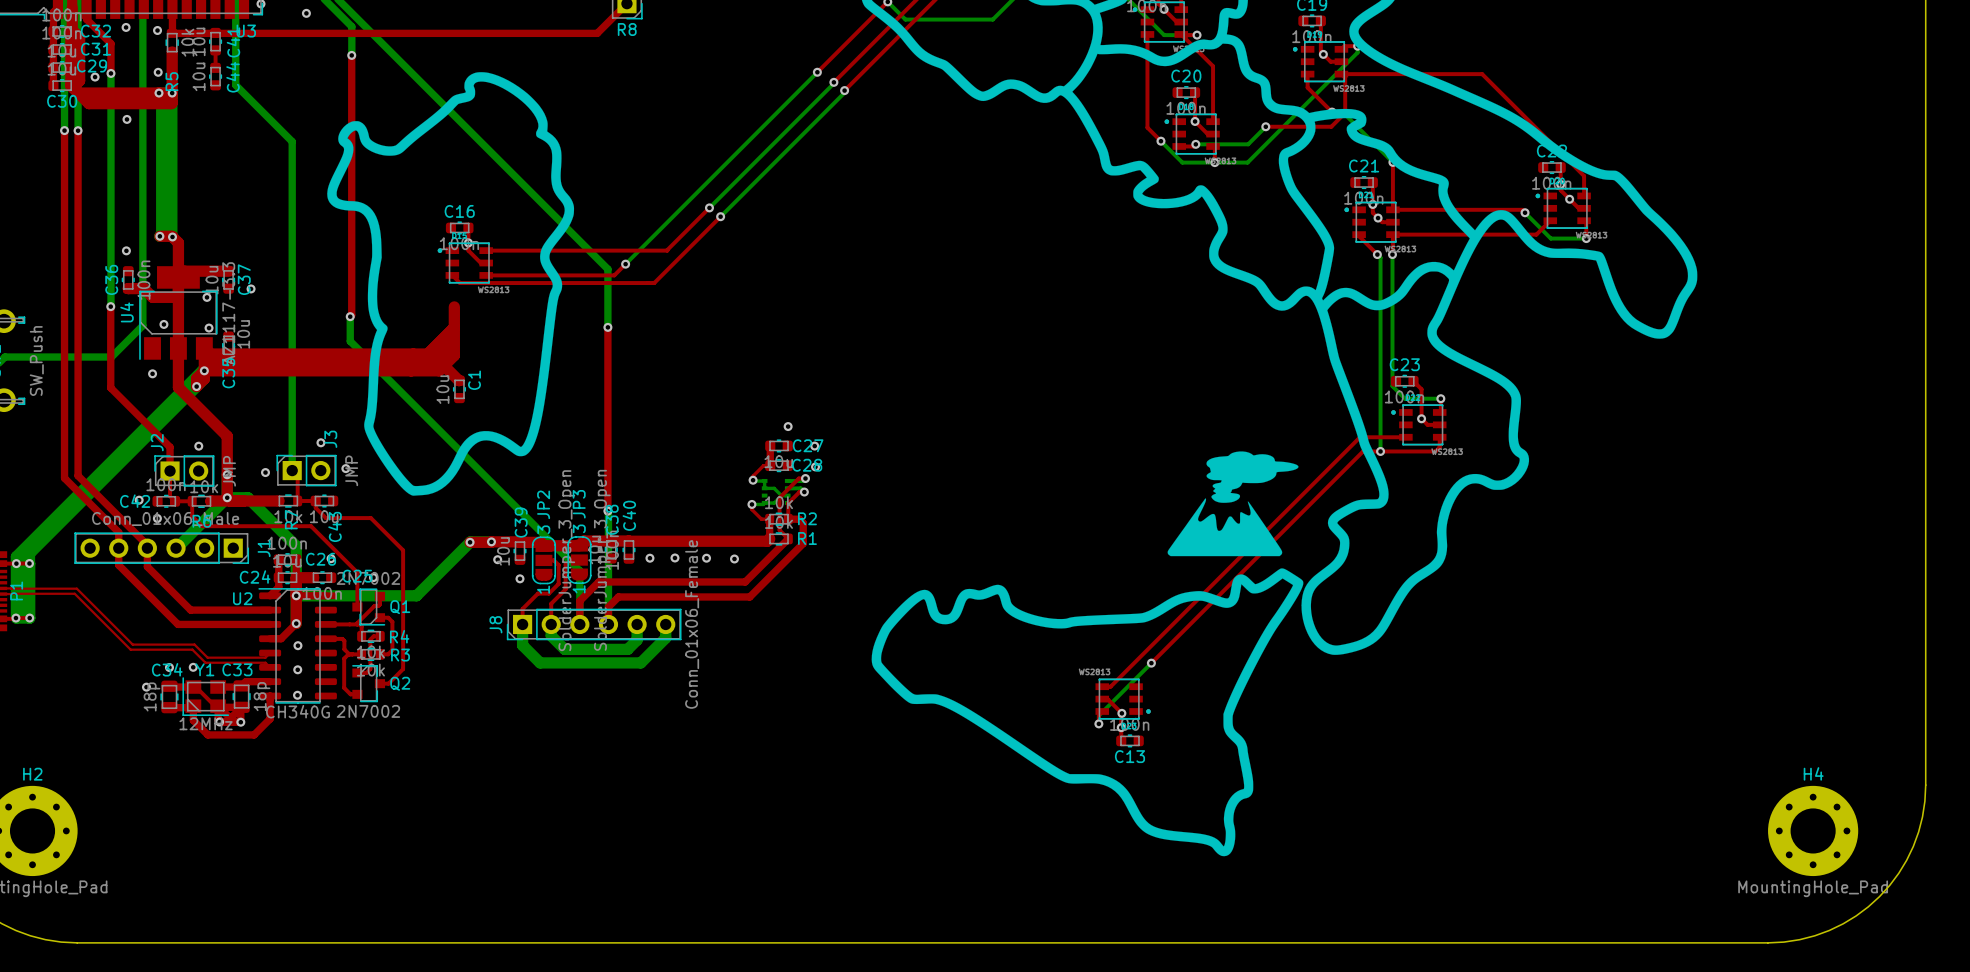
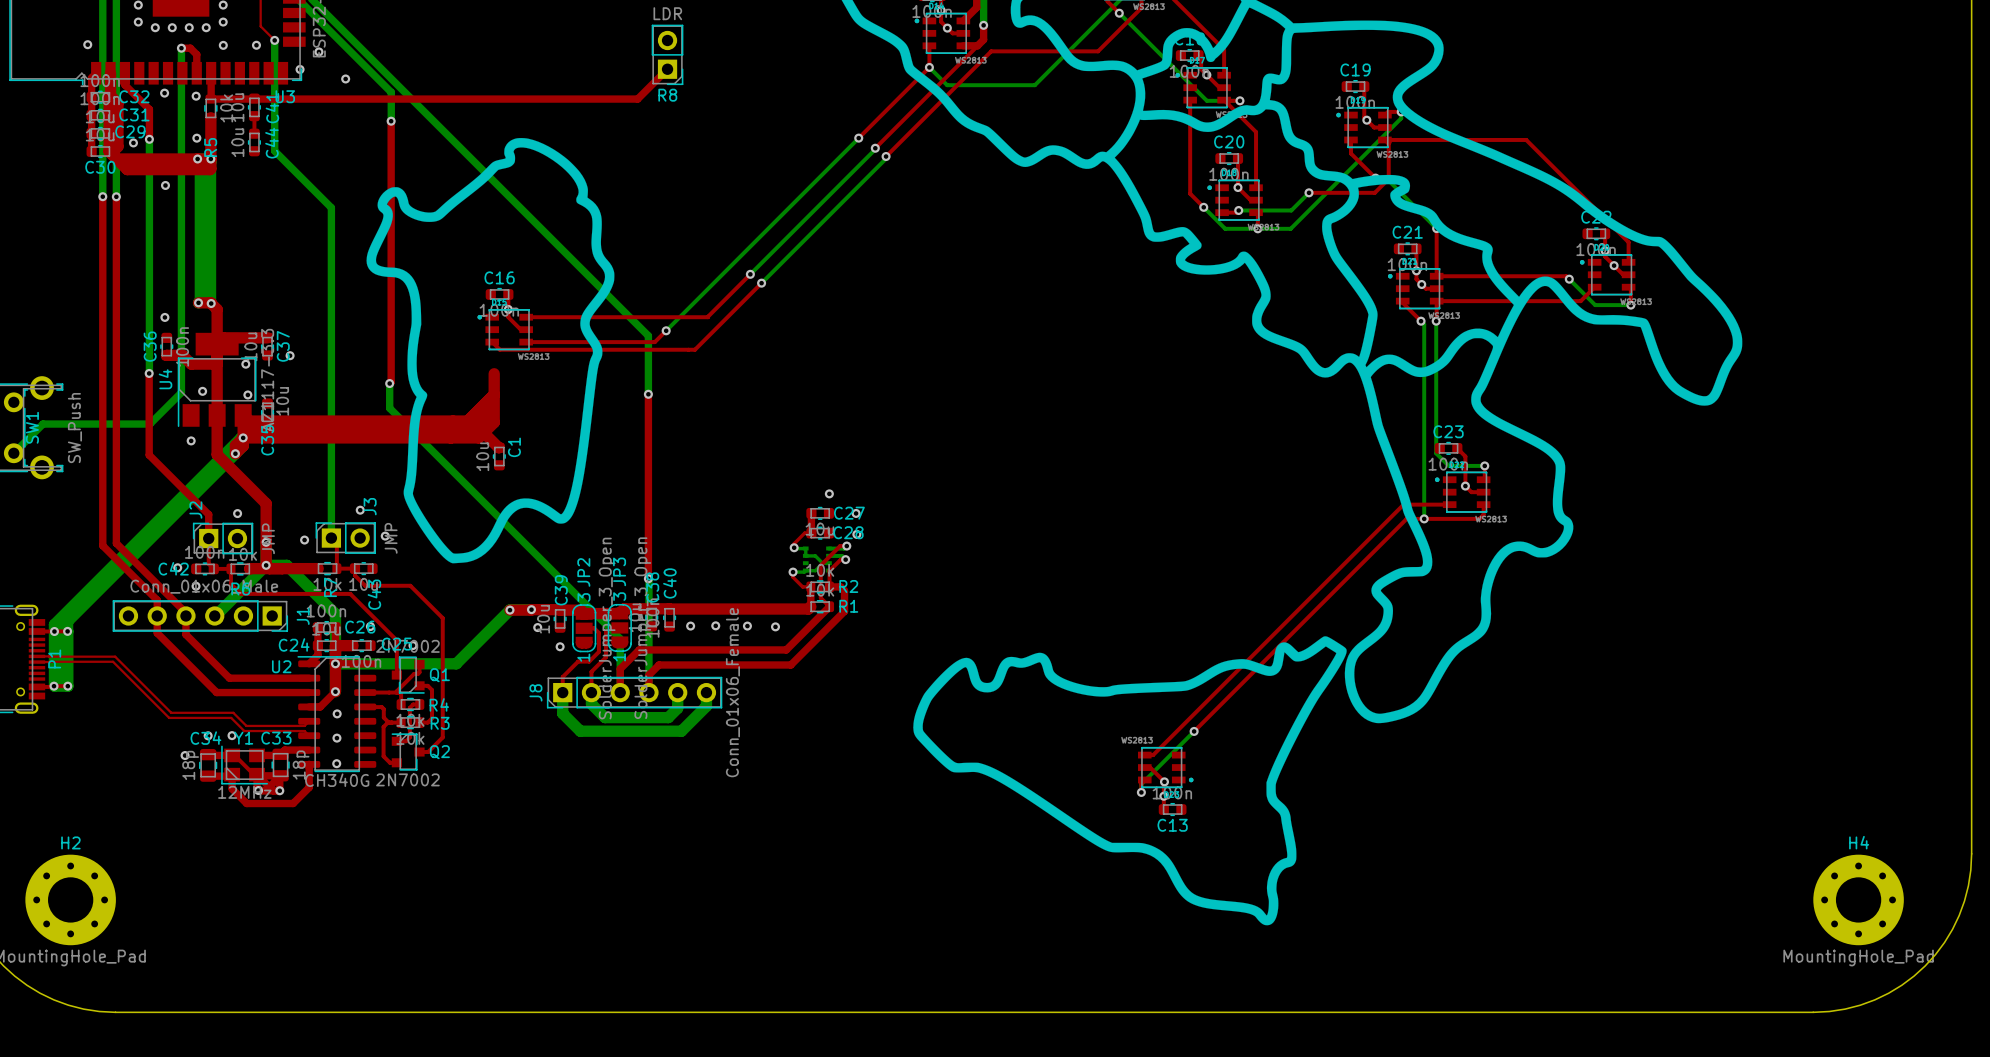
drawing: [1167, 451, 1299, 557] -> none

